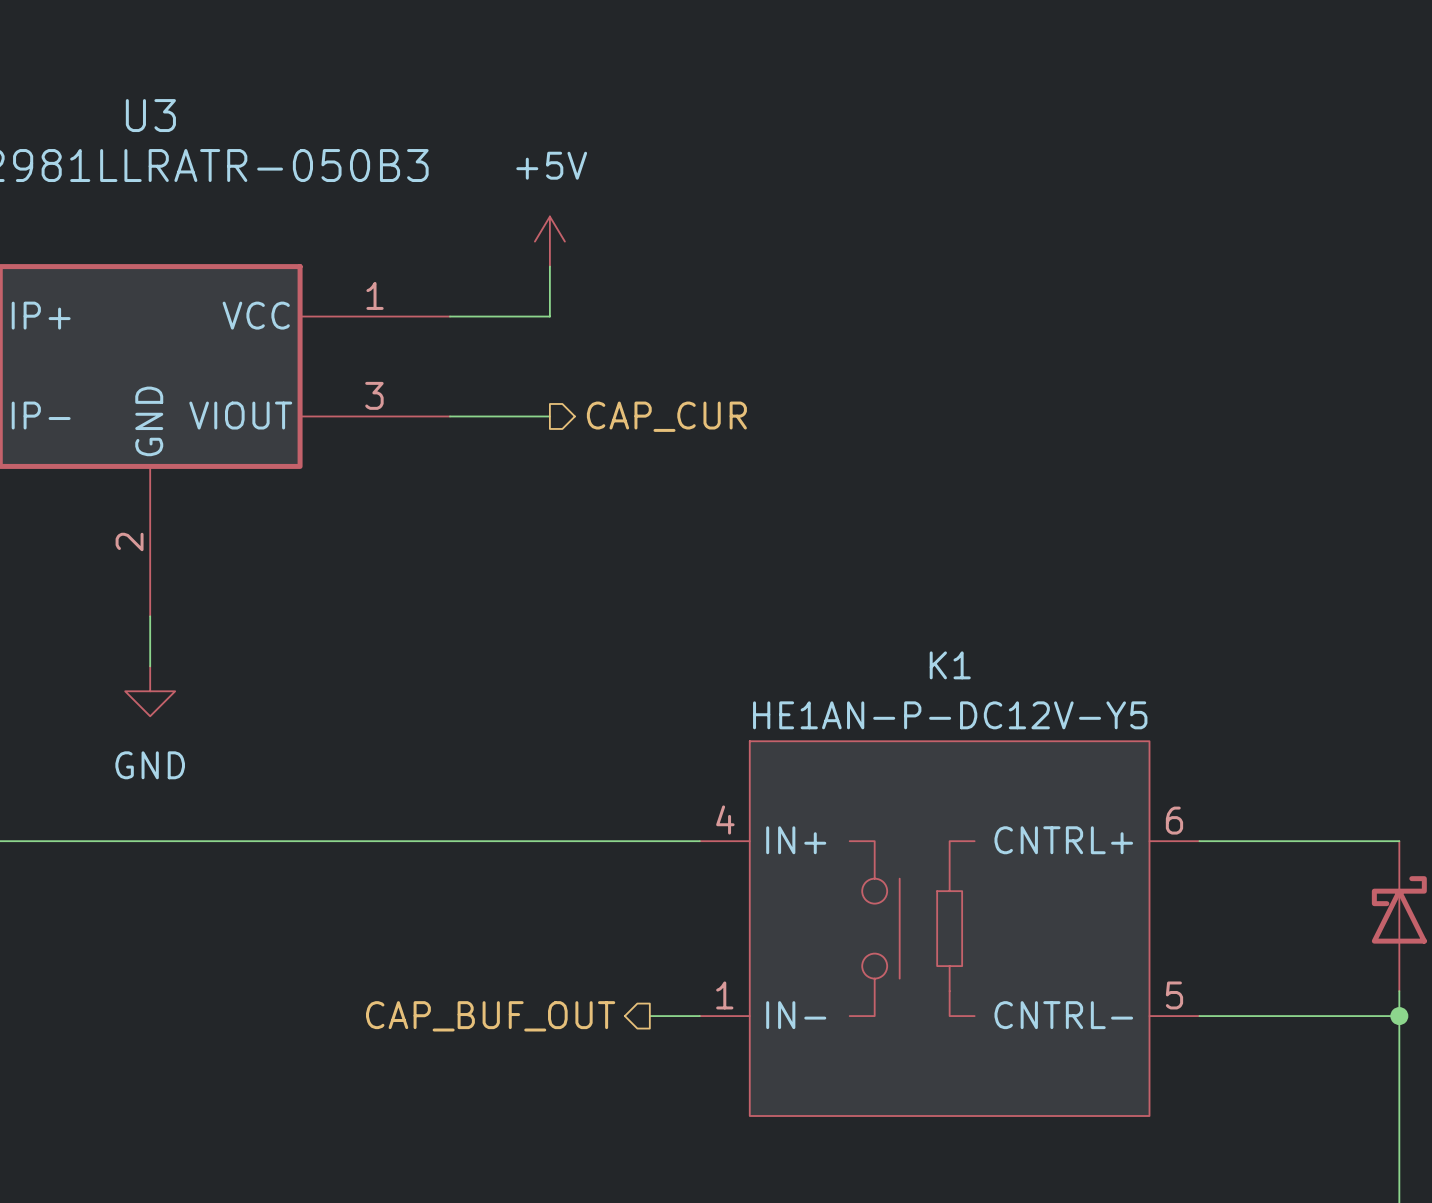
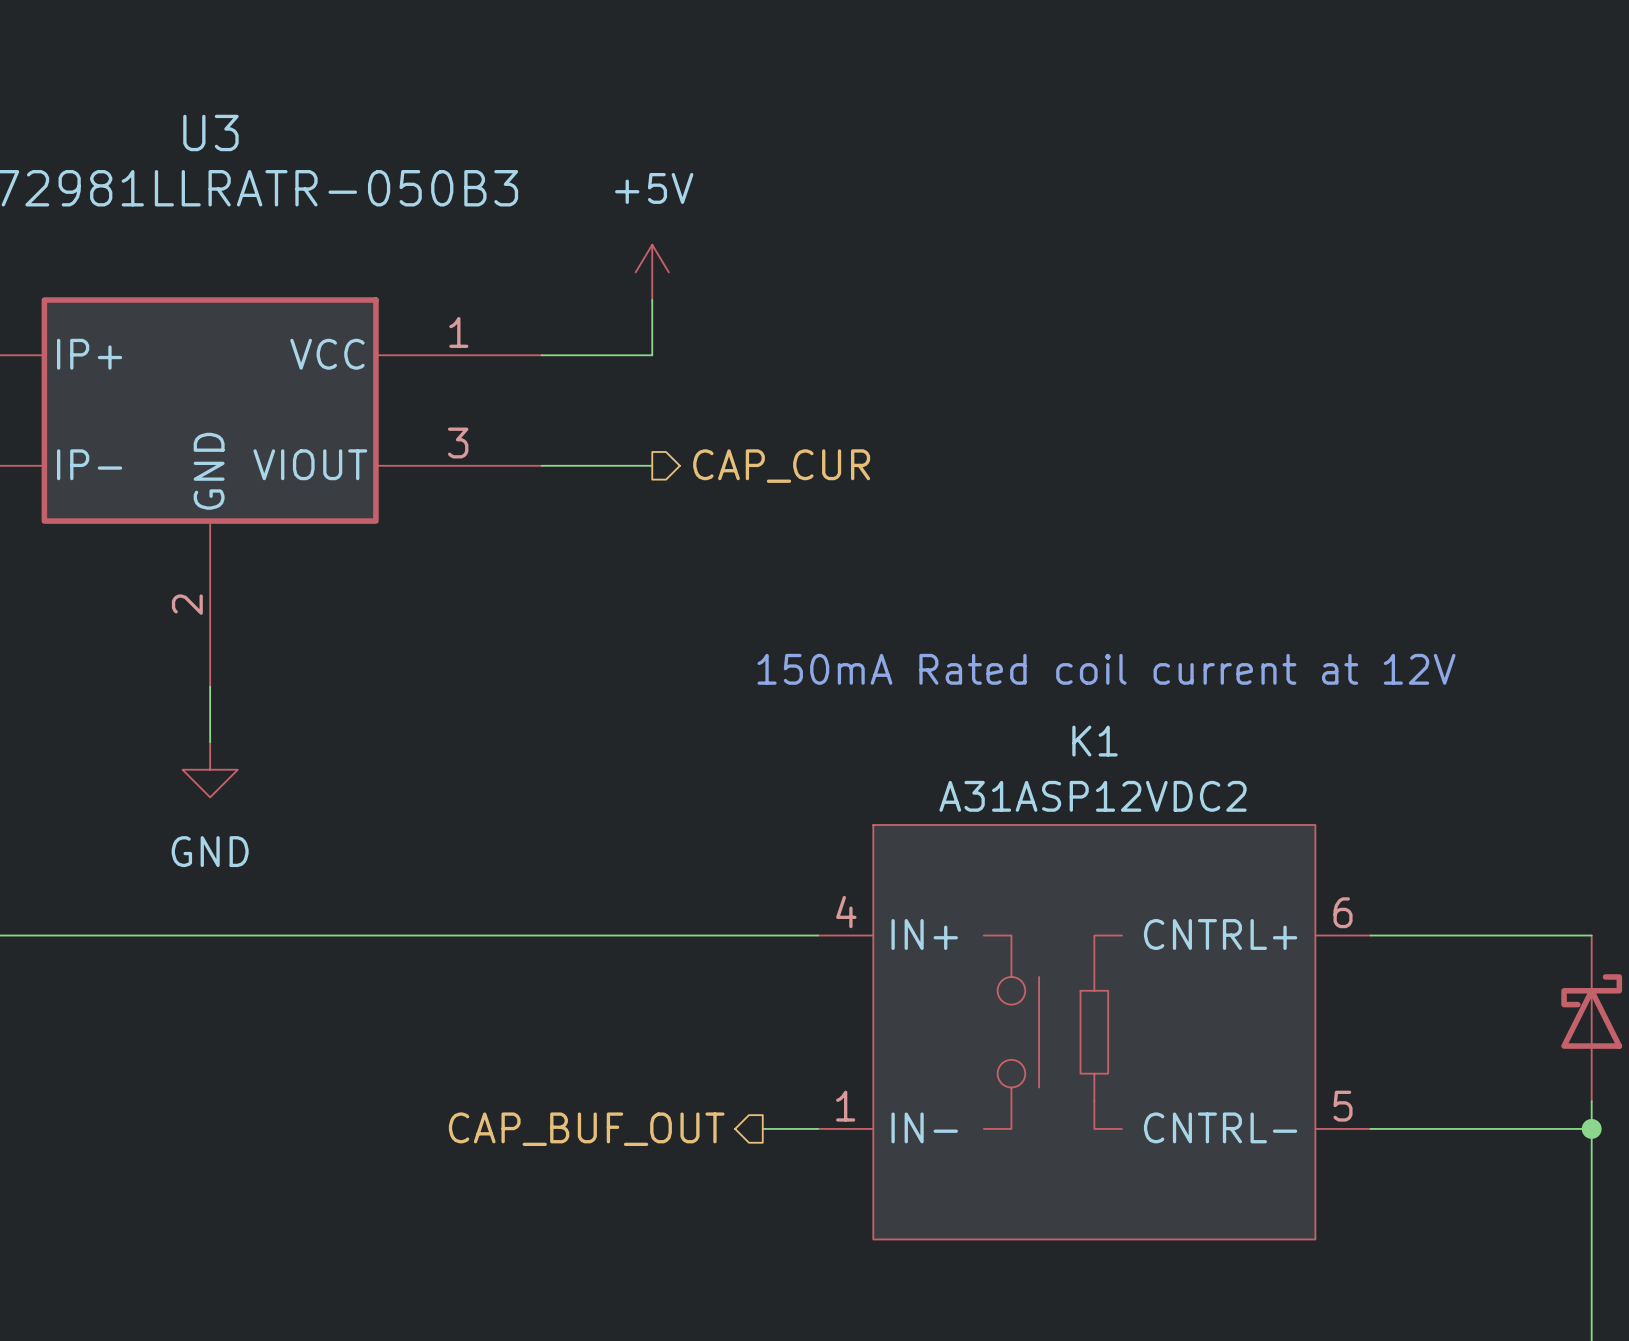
text: none -> 150mA Rated coil current at 12V (1106, 669)
K1 value: HE1AN-P-DC12V-Y5 (950, 715) -> A31ASP12VDC2 (1093, 796)

